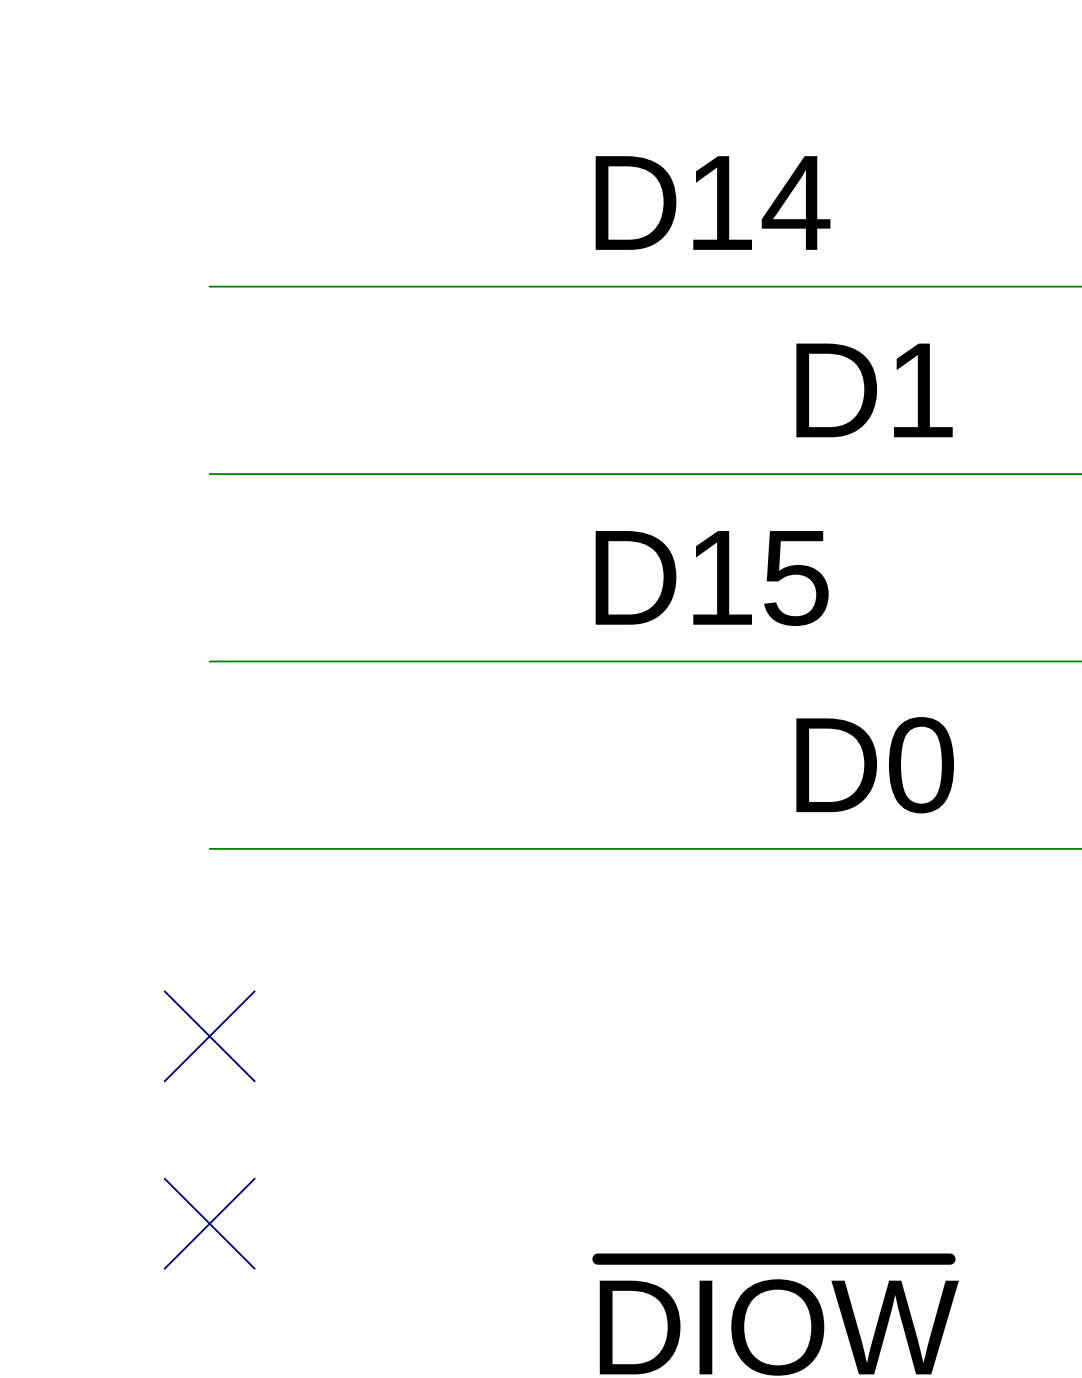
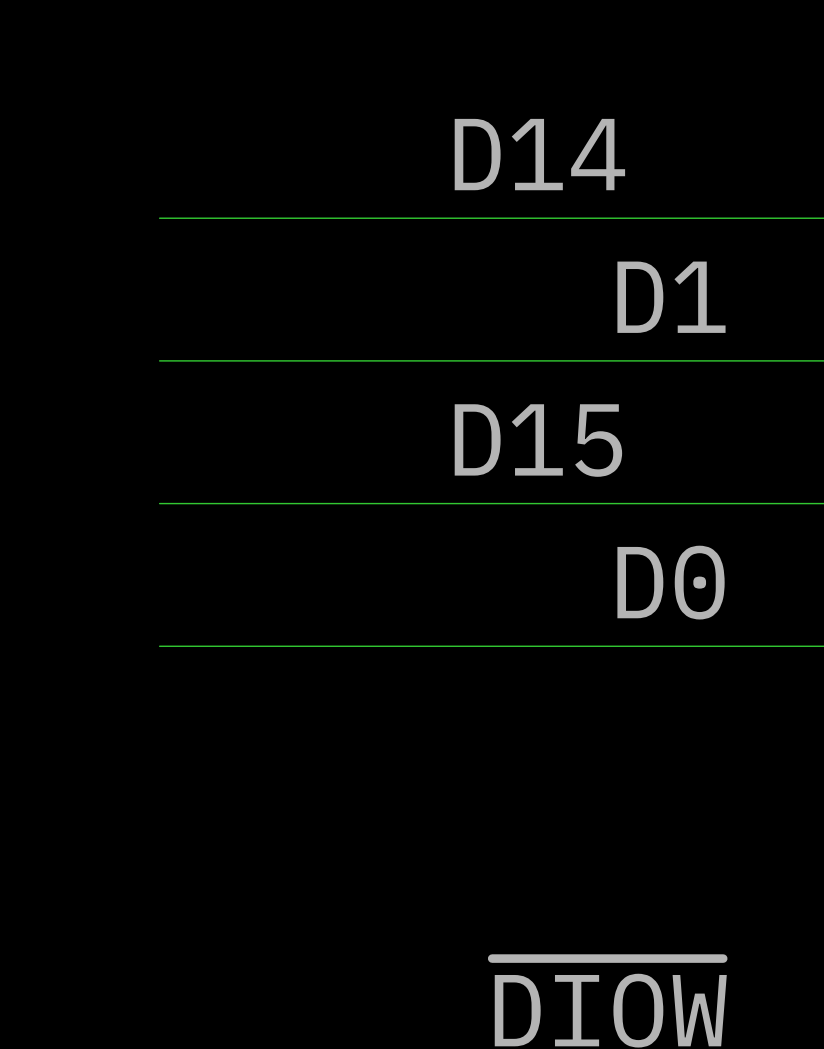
no-connect mark: (209, 1036) -> none
no-connect mark: (209, 1223) -> none

